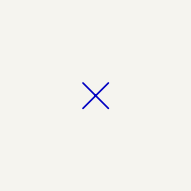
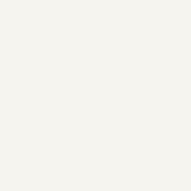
no-connect mark: (95, 95) -> none

